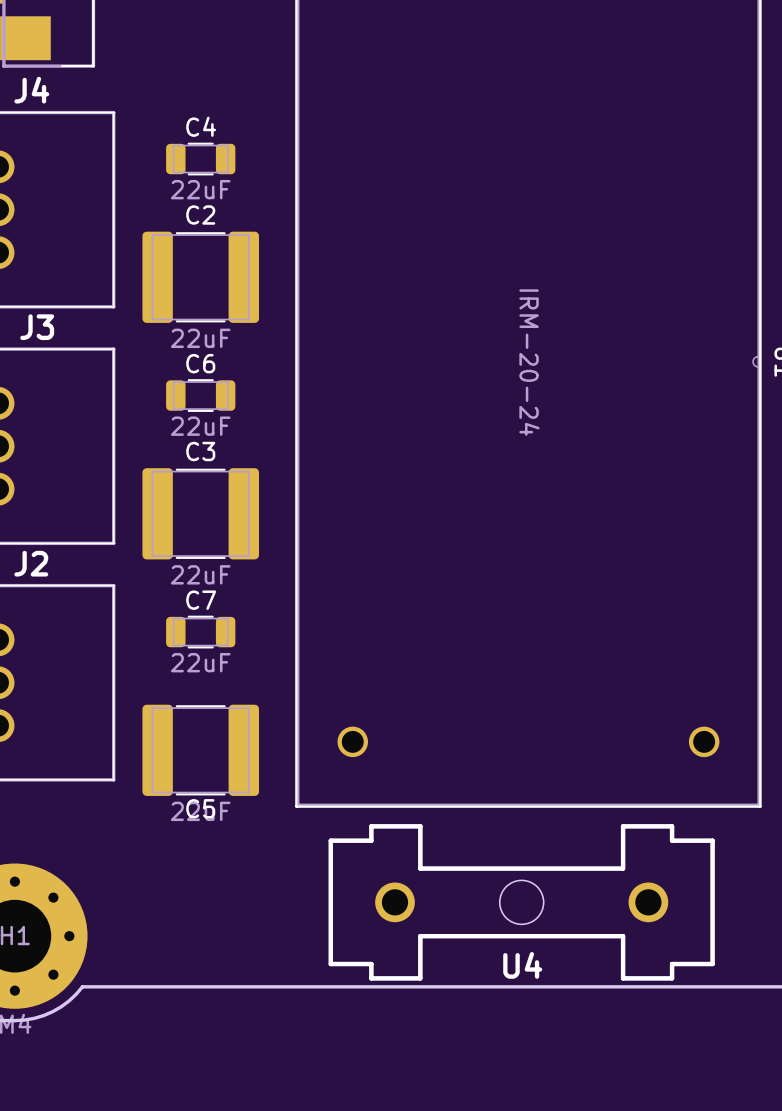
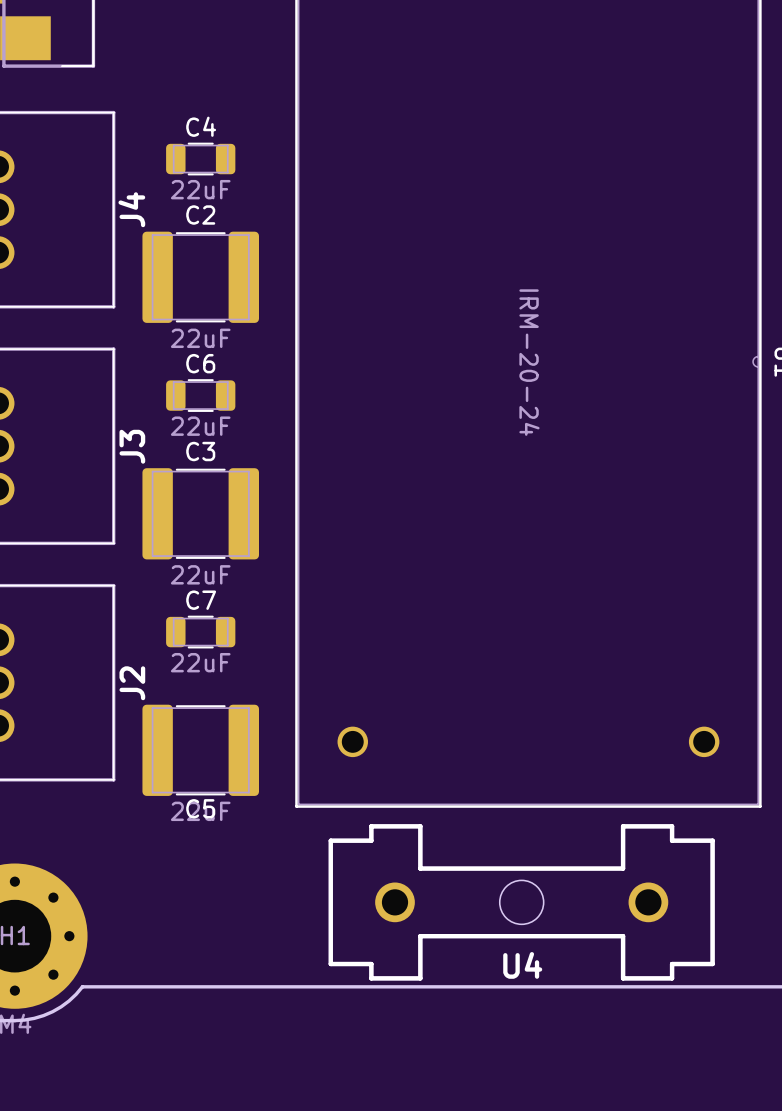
J4 name rotation: 0° (31, 90) -> 90° counterclockwise (131, 209)
J4 name position: J4 (31, 90) -> J4 (131, 209)
J3 name rotation: 0° (37, 327) -> 90° counterclockwise (132, 446)
J3 name position: J3 (37, 327) -> J3 (132, 446)
J2 name rotation: 0° (31, 563) -> 90° counterclockwise (132, 683)
J2 name position: J2 (31, 563) -> J2 (132, 683)

